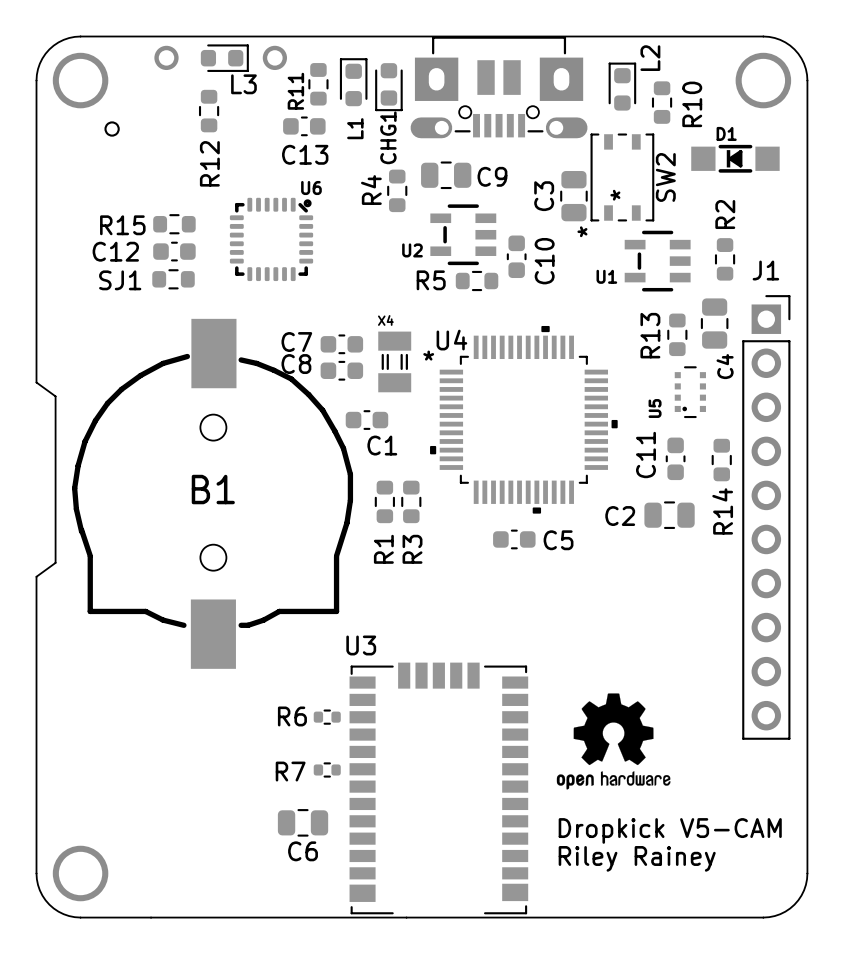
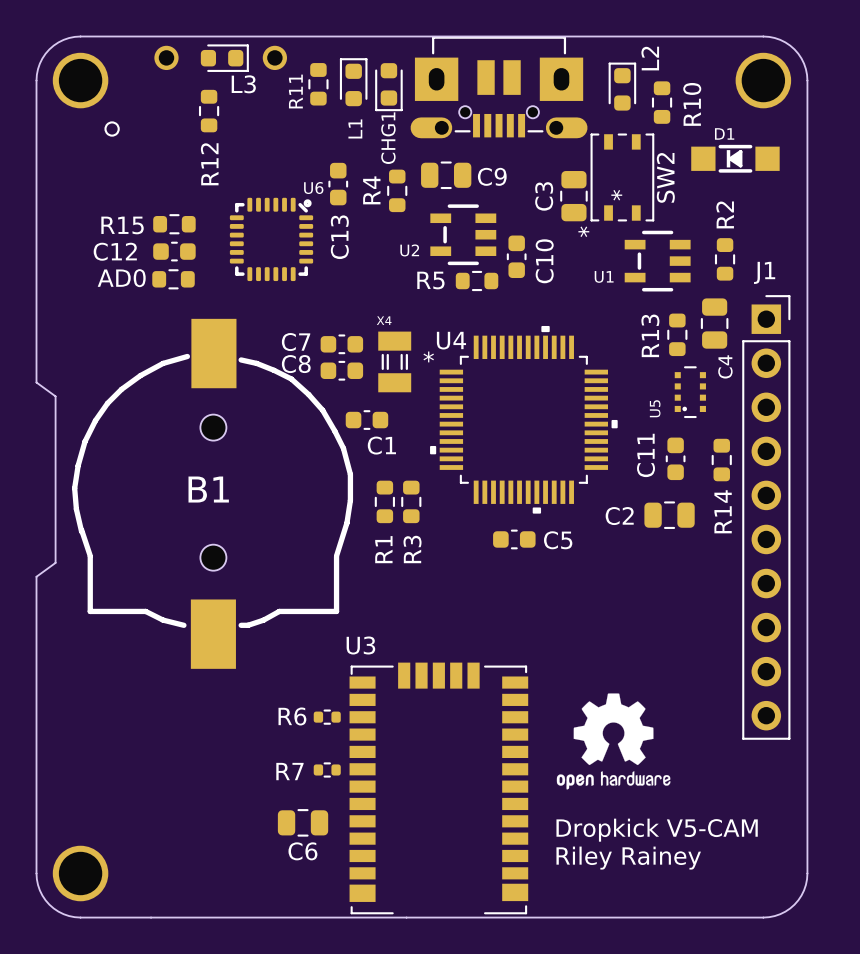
C13 rotation: 0° (304, 126) -> 90° clockwise (338, 184)
C13 position: (304, 126) -> (338, 184)
SJ1 name: SJ1 (120, 280) -> AD0 (121, 278)

